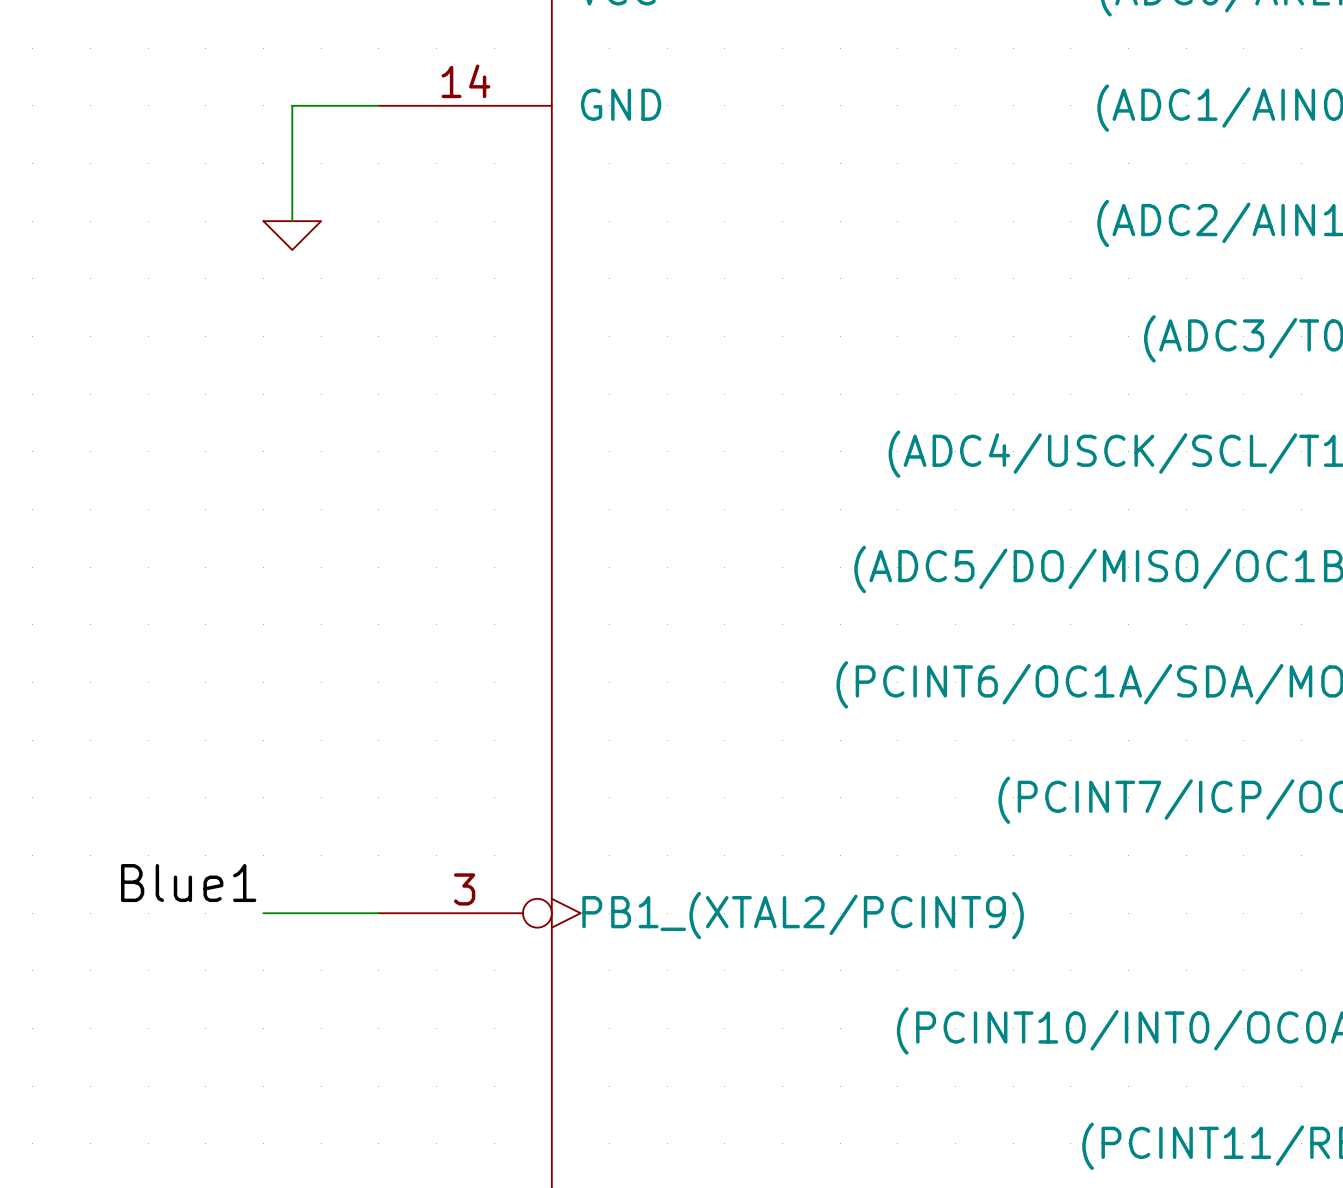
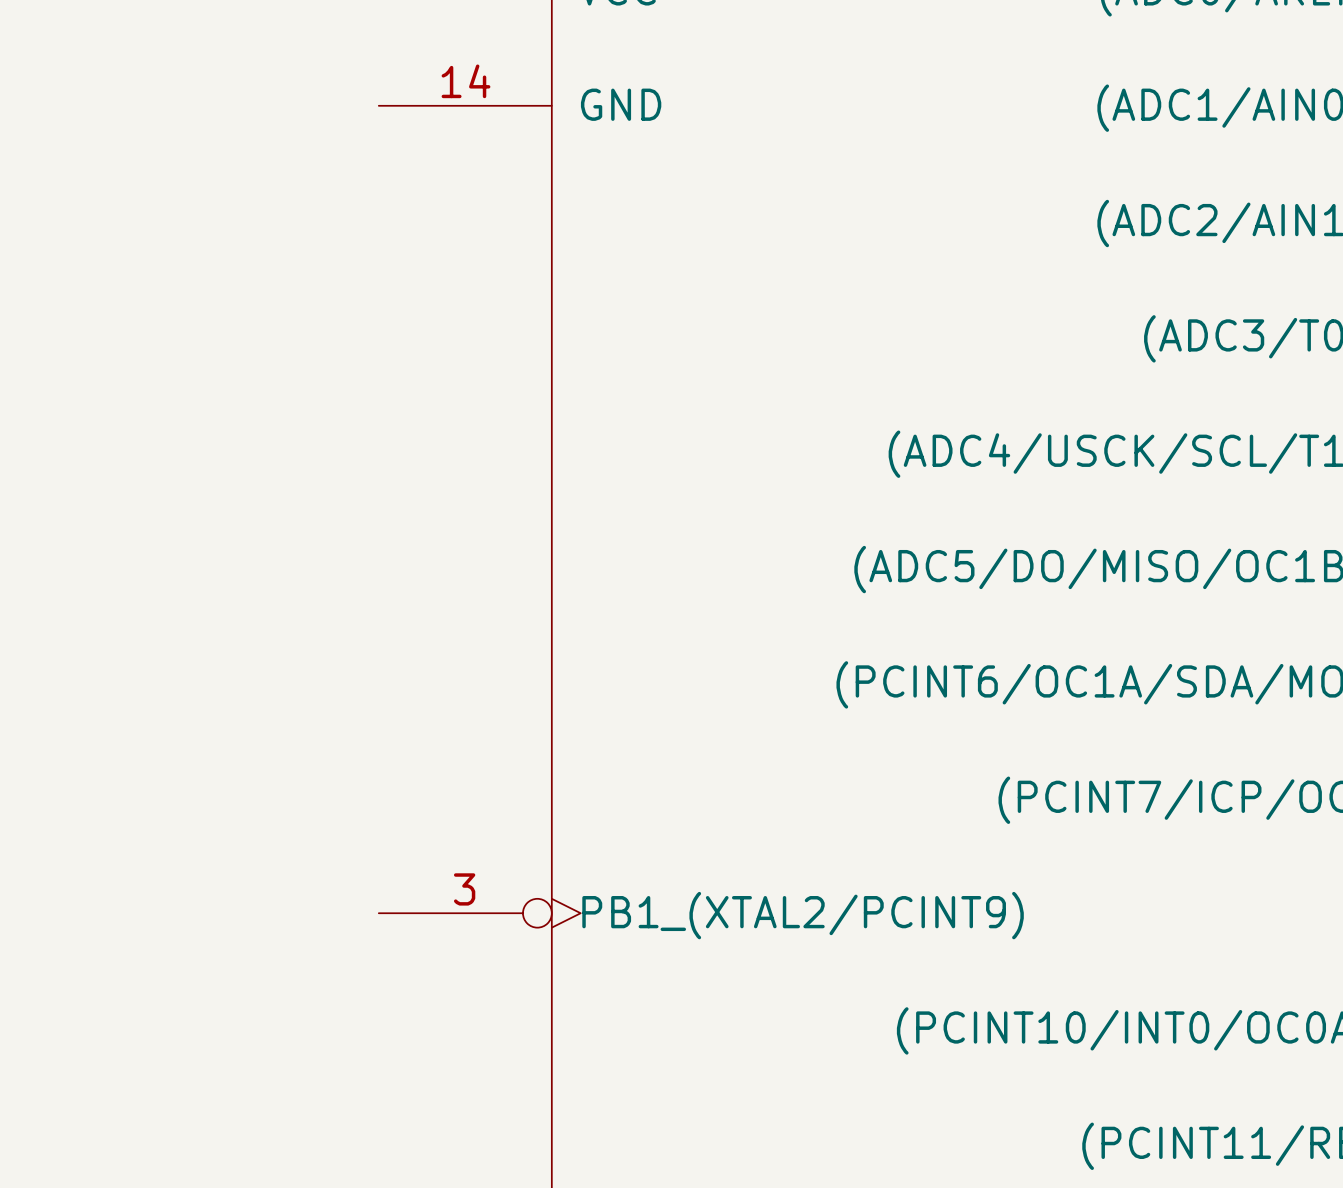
wire: (378, 105) (292, 105) (292, 221) -> none
power symbol: (292, 235) -> none
label: Blue1 (188, 883) -> none
wire: (263, 913) (378, 913) -> none

